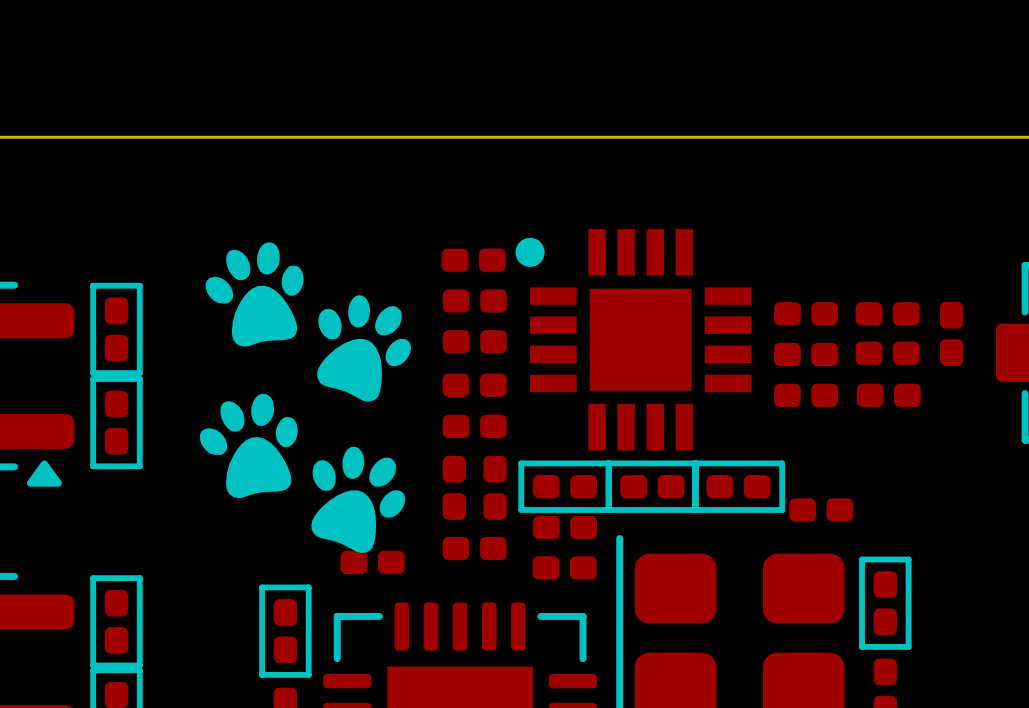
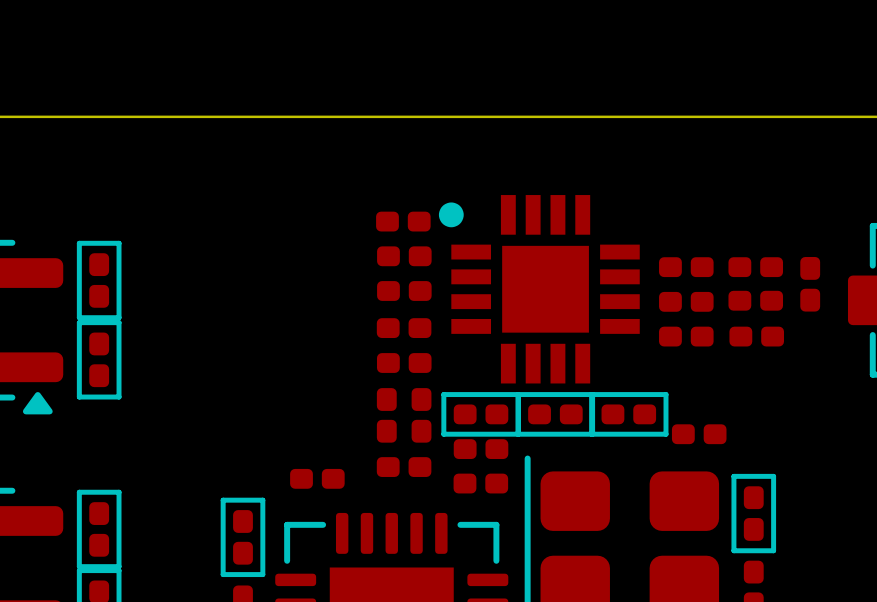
drawing: [199, 242, 412, 554] -> none

